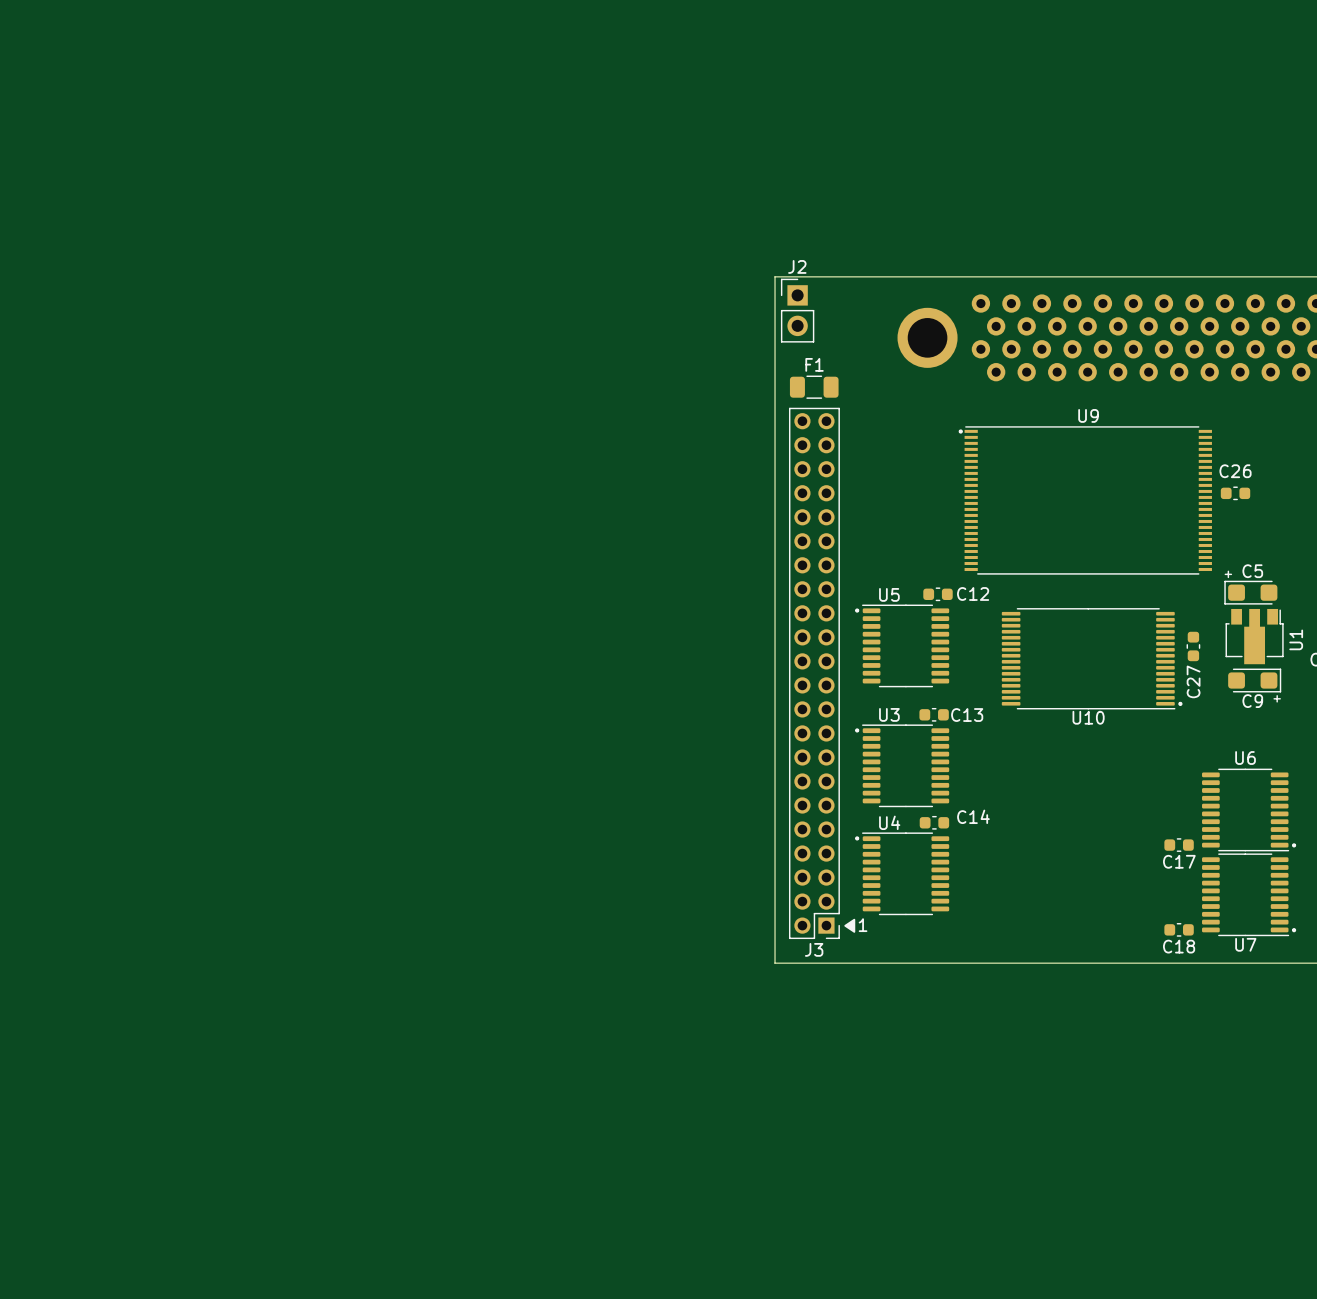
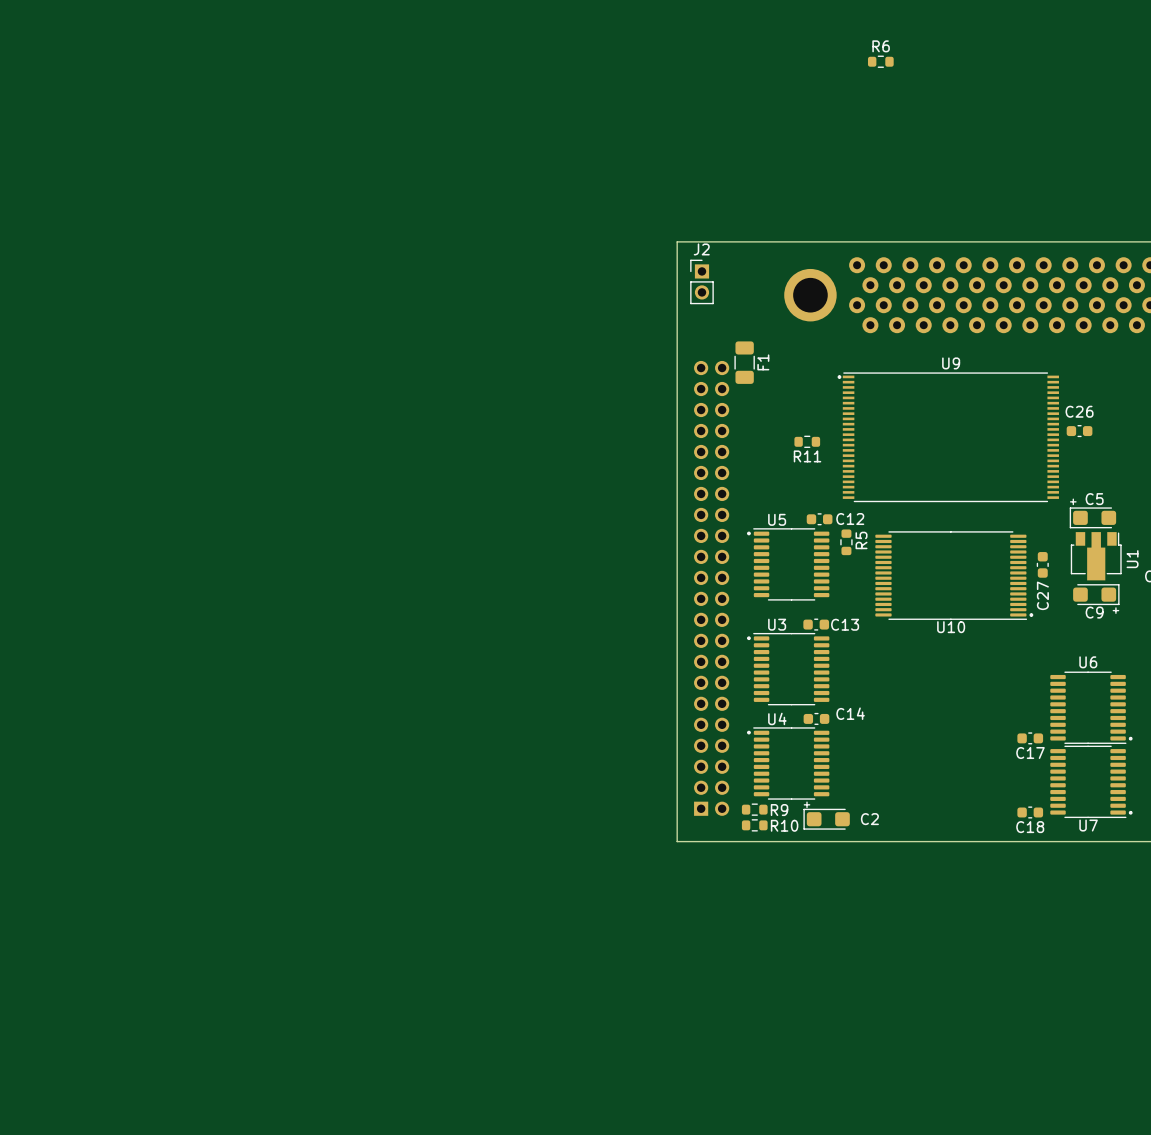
R6: none -> (880, 61)
J2 footprint: [780, 278, 815, 343] -> [690, 259, 714, 305]
F1 rotation: 0° (814, 387) -> 90° clockwise (744, 362)
F1 position: (814, 387) -> (744, 362)
R11: none -> (807, 441)
R5: none -> (846, 542)
J3 side: top (814, 673) -> bottom (711, 588)
drawing: [844, 918, 856, 933] -> none
text: 1 (863, 925) -> none
R9: none -> (754, 809)
C2: none -> (826, 815)
R10: none -> (754, 825)

